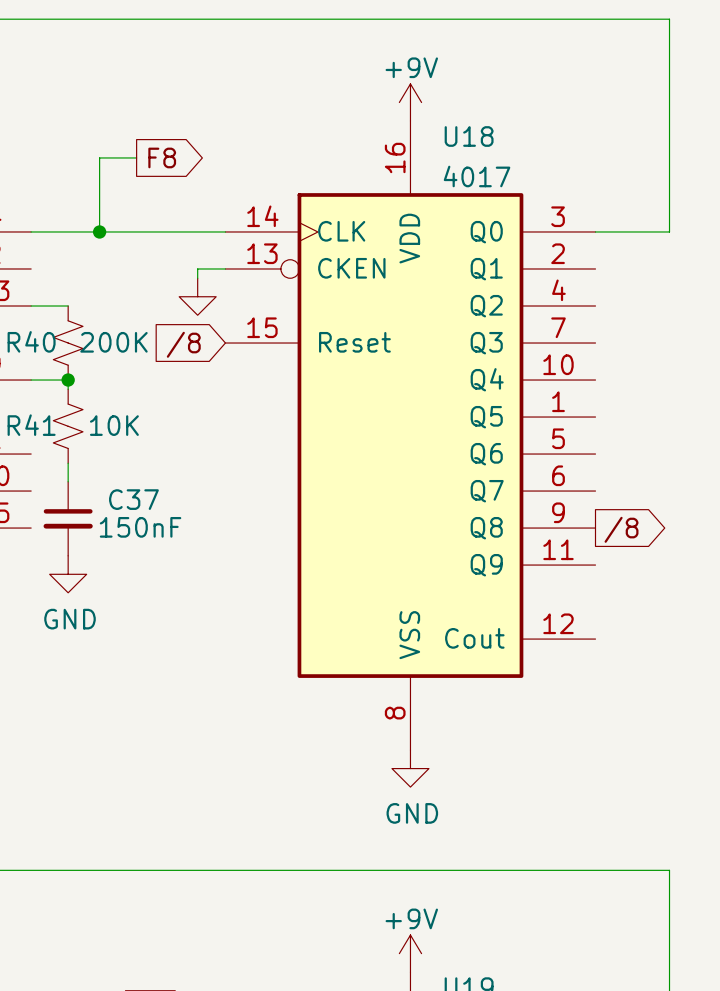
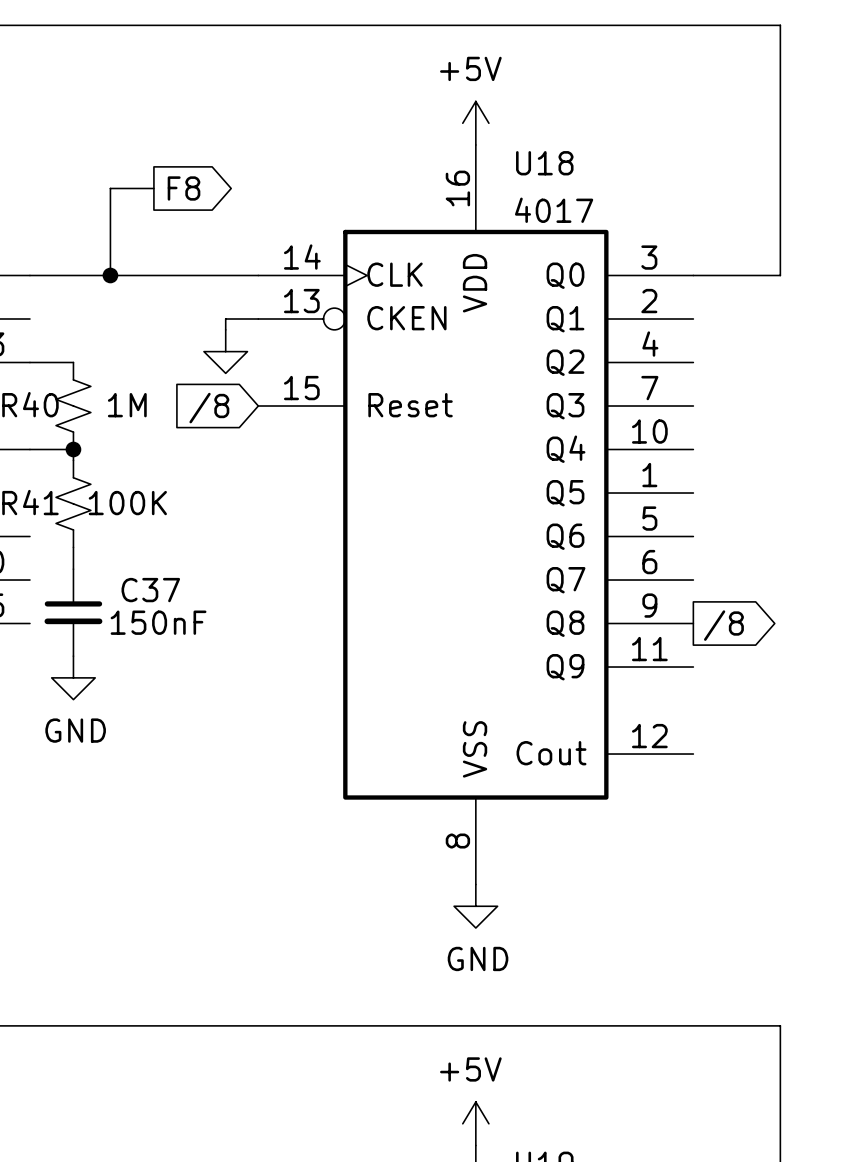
power symbol: +9V (410, 102) -> +5V (475, 123)
R40 value: 200K (113, 342) -> 1M (127, 405)
R41 value: 10K (114, 425) -> 100K (127, 503)
power symbol: +9V (410, 953) -> +5V (475, 1123)

